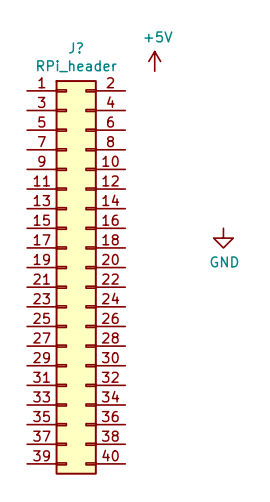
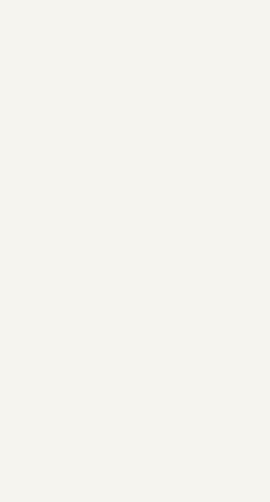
power symbol: +5V (154, 61) -> none
power symbol: GND (223, 238) -> none
J?: RPi_header (76, 277) -> none

